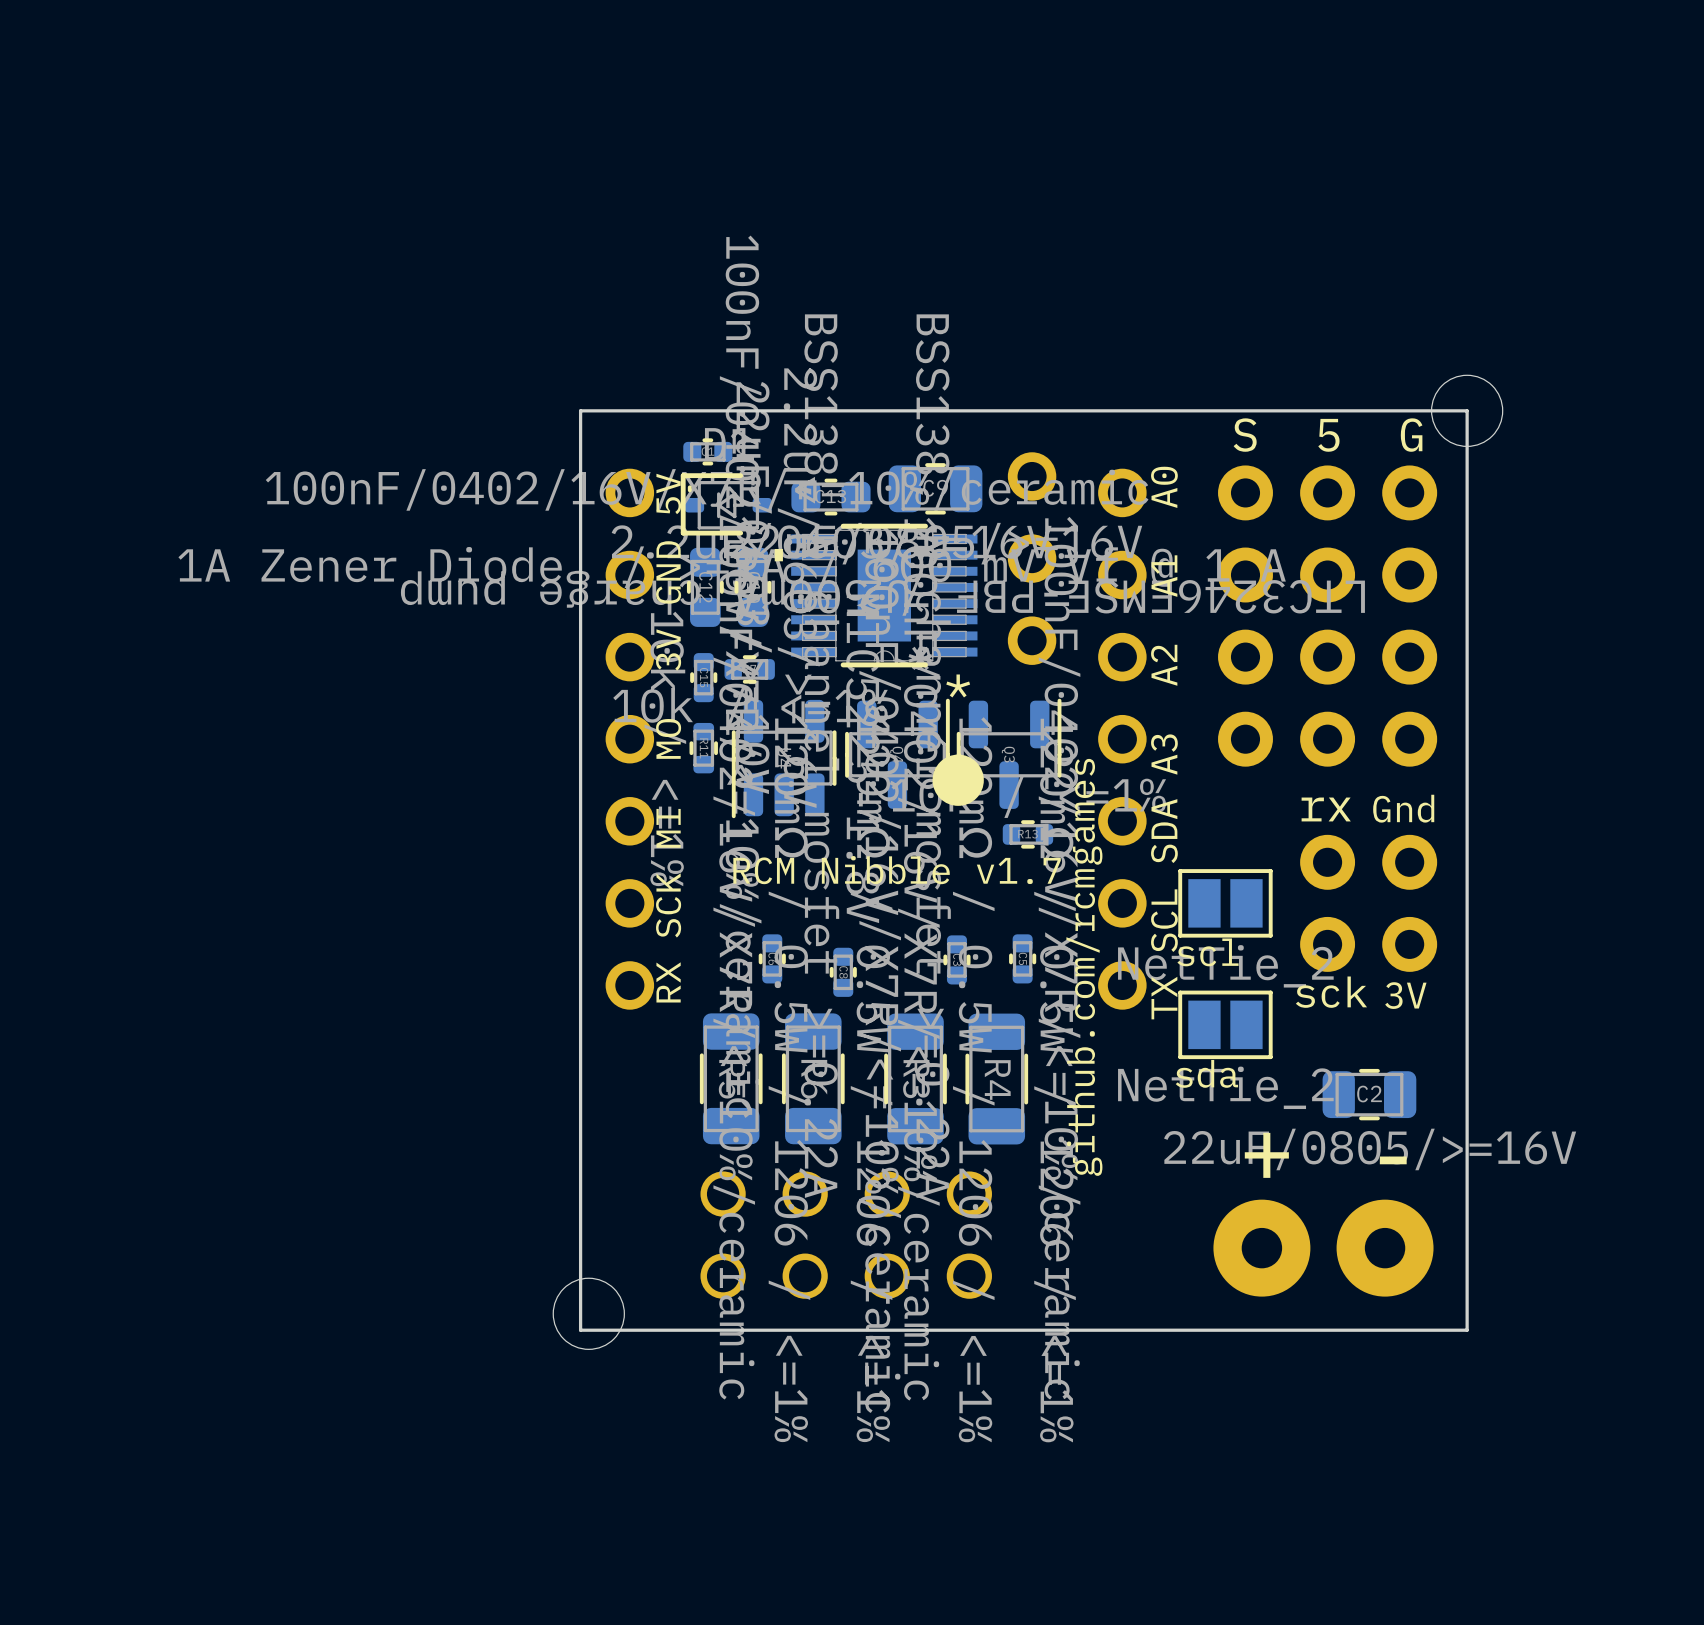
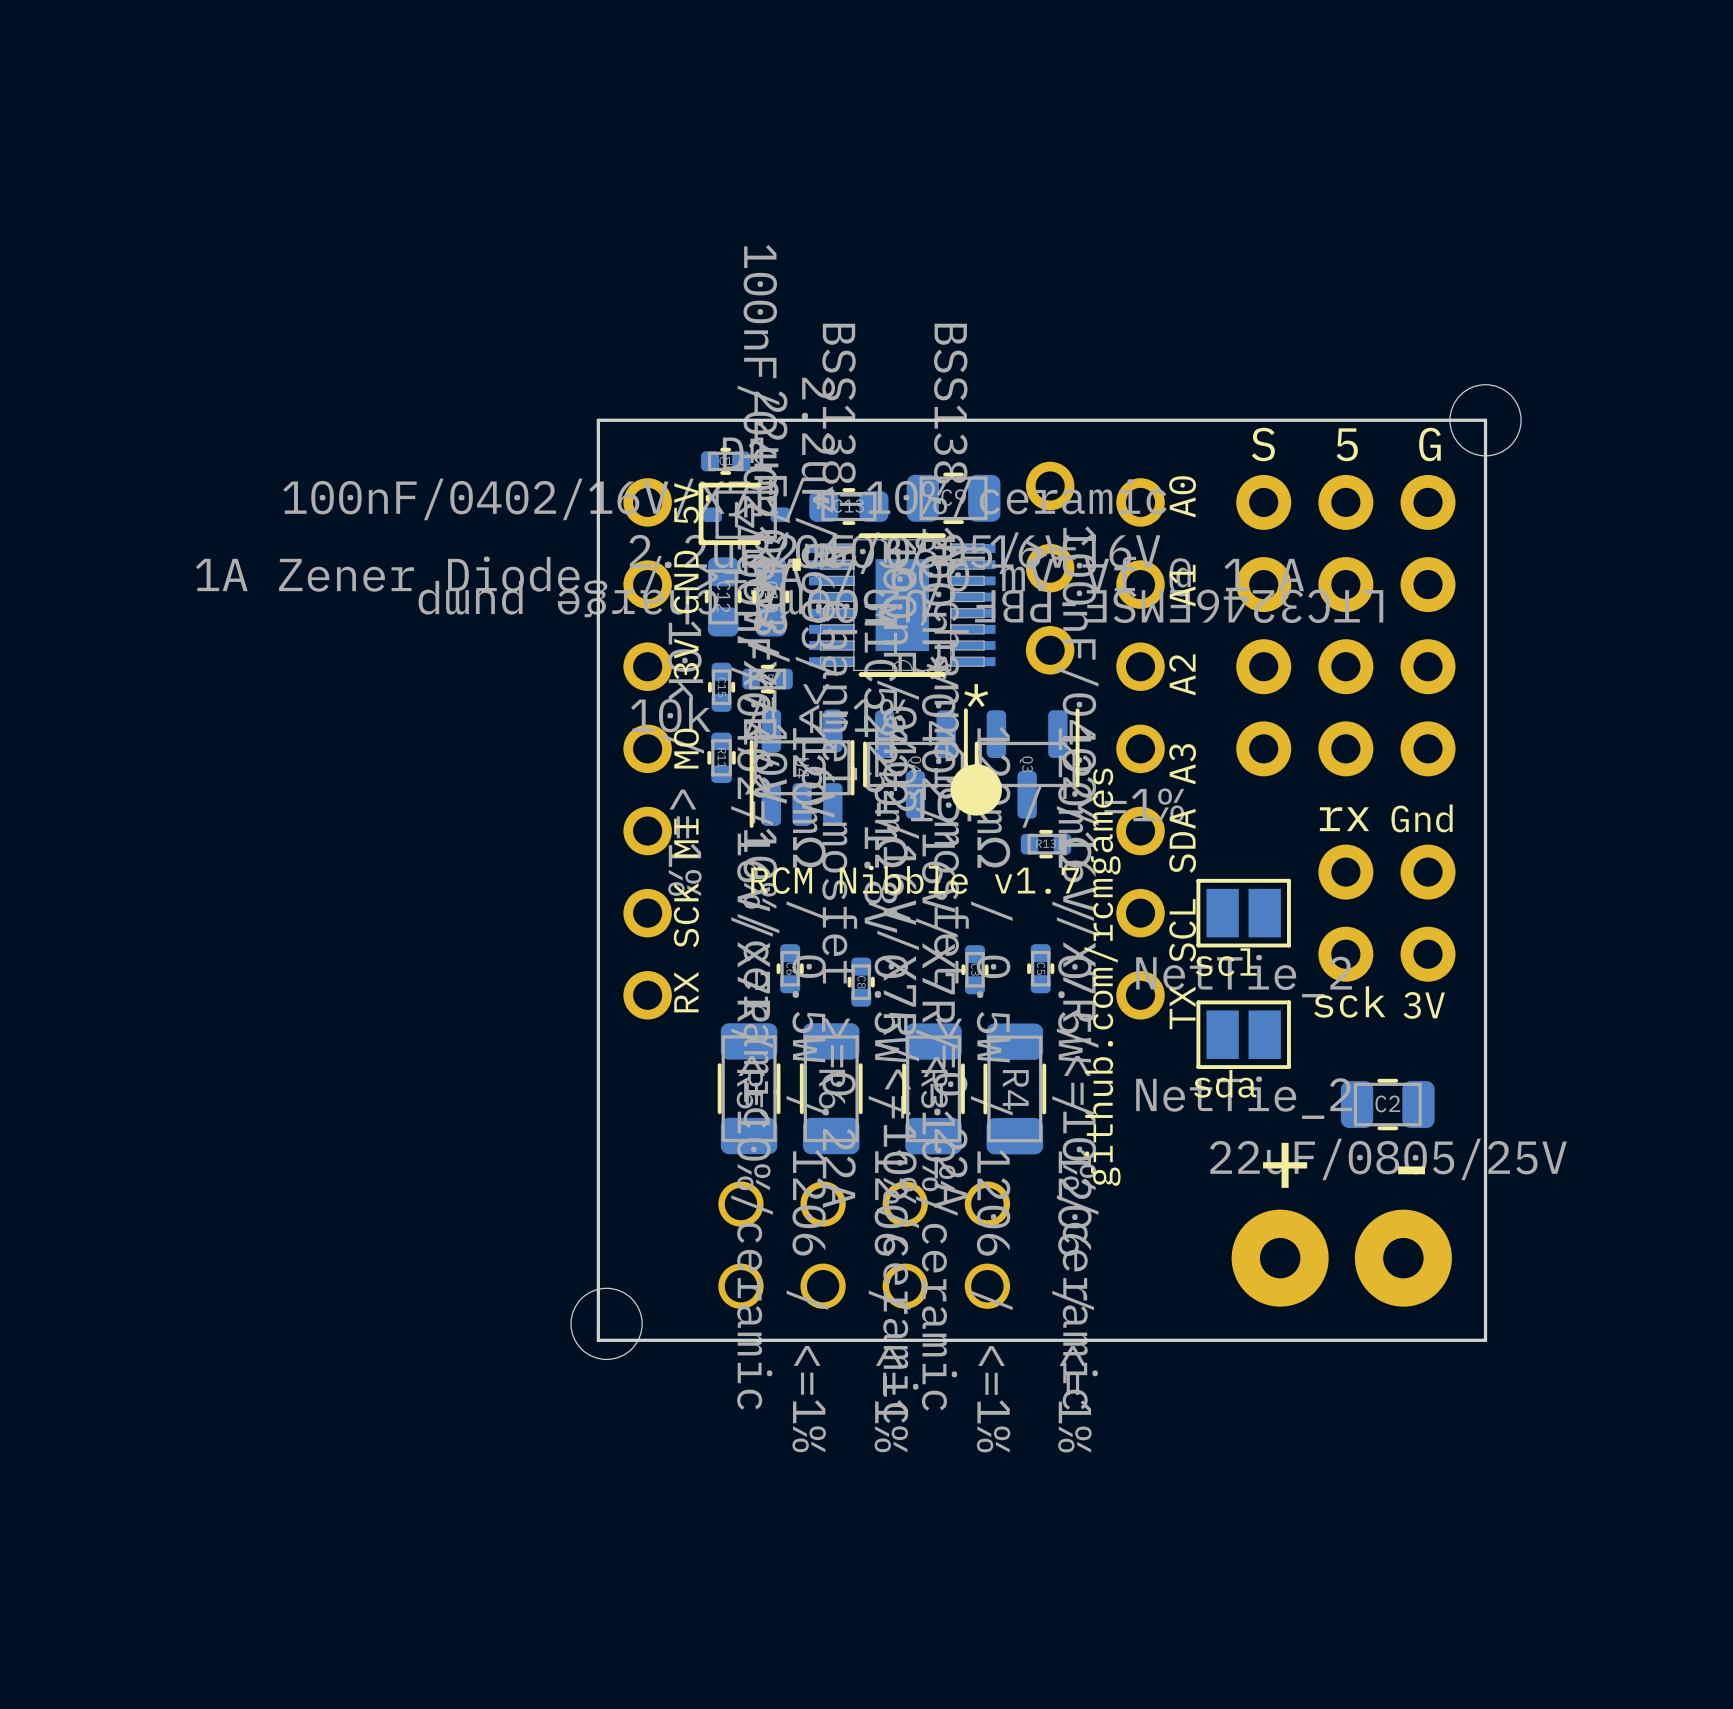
C2 value: 22uF/0805/>=16V (1370, 1149) -> 22uF/0805/25V (1388, 1159)

